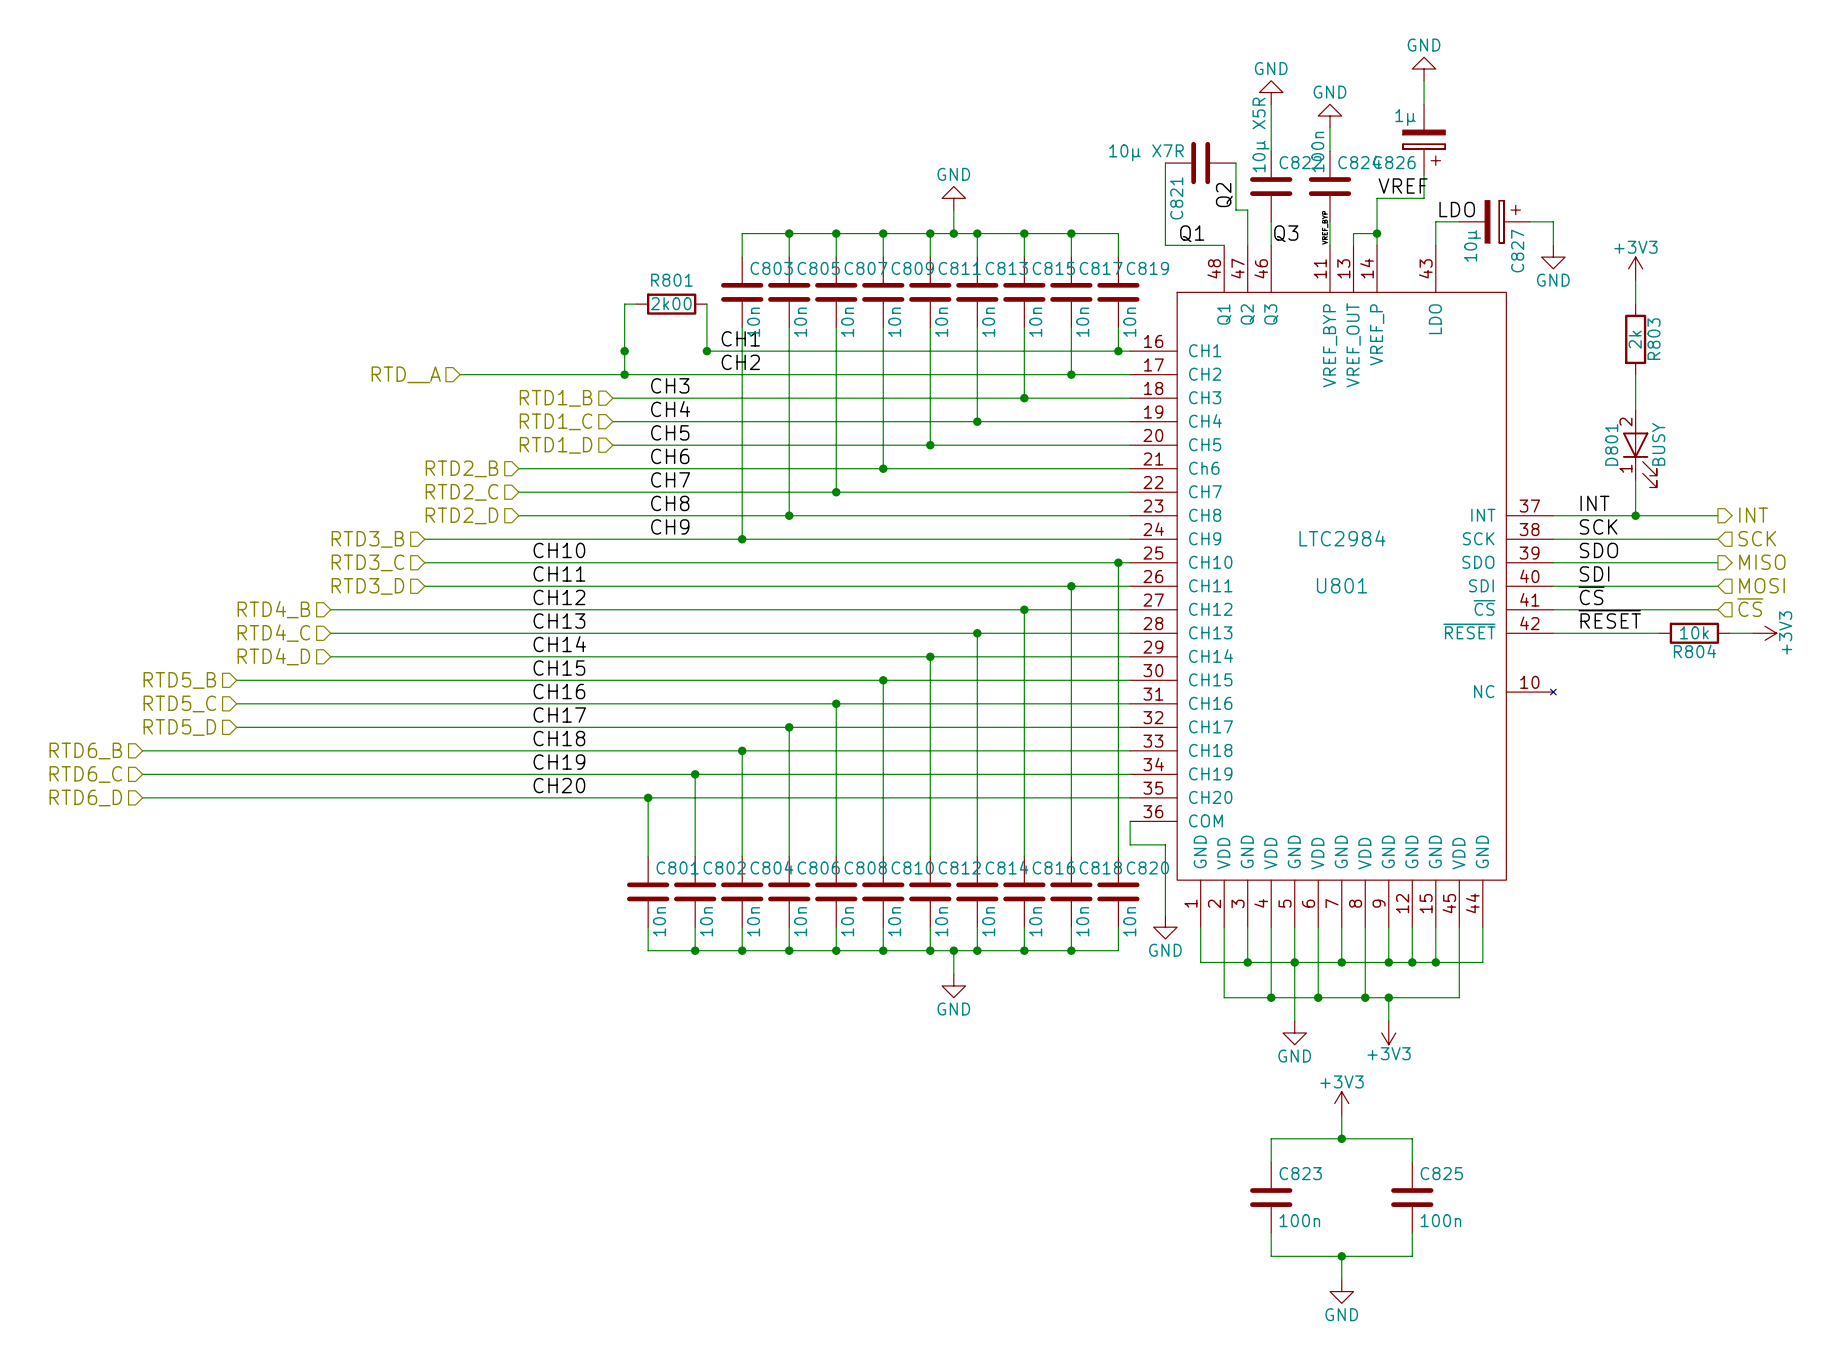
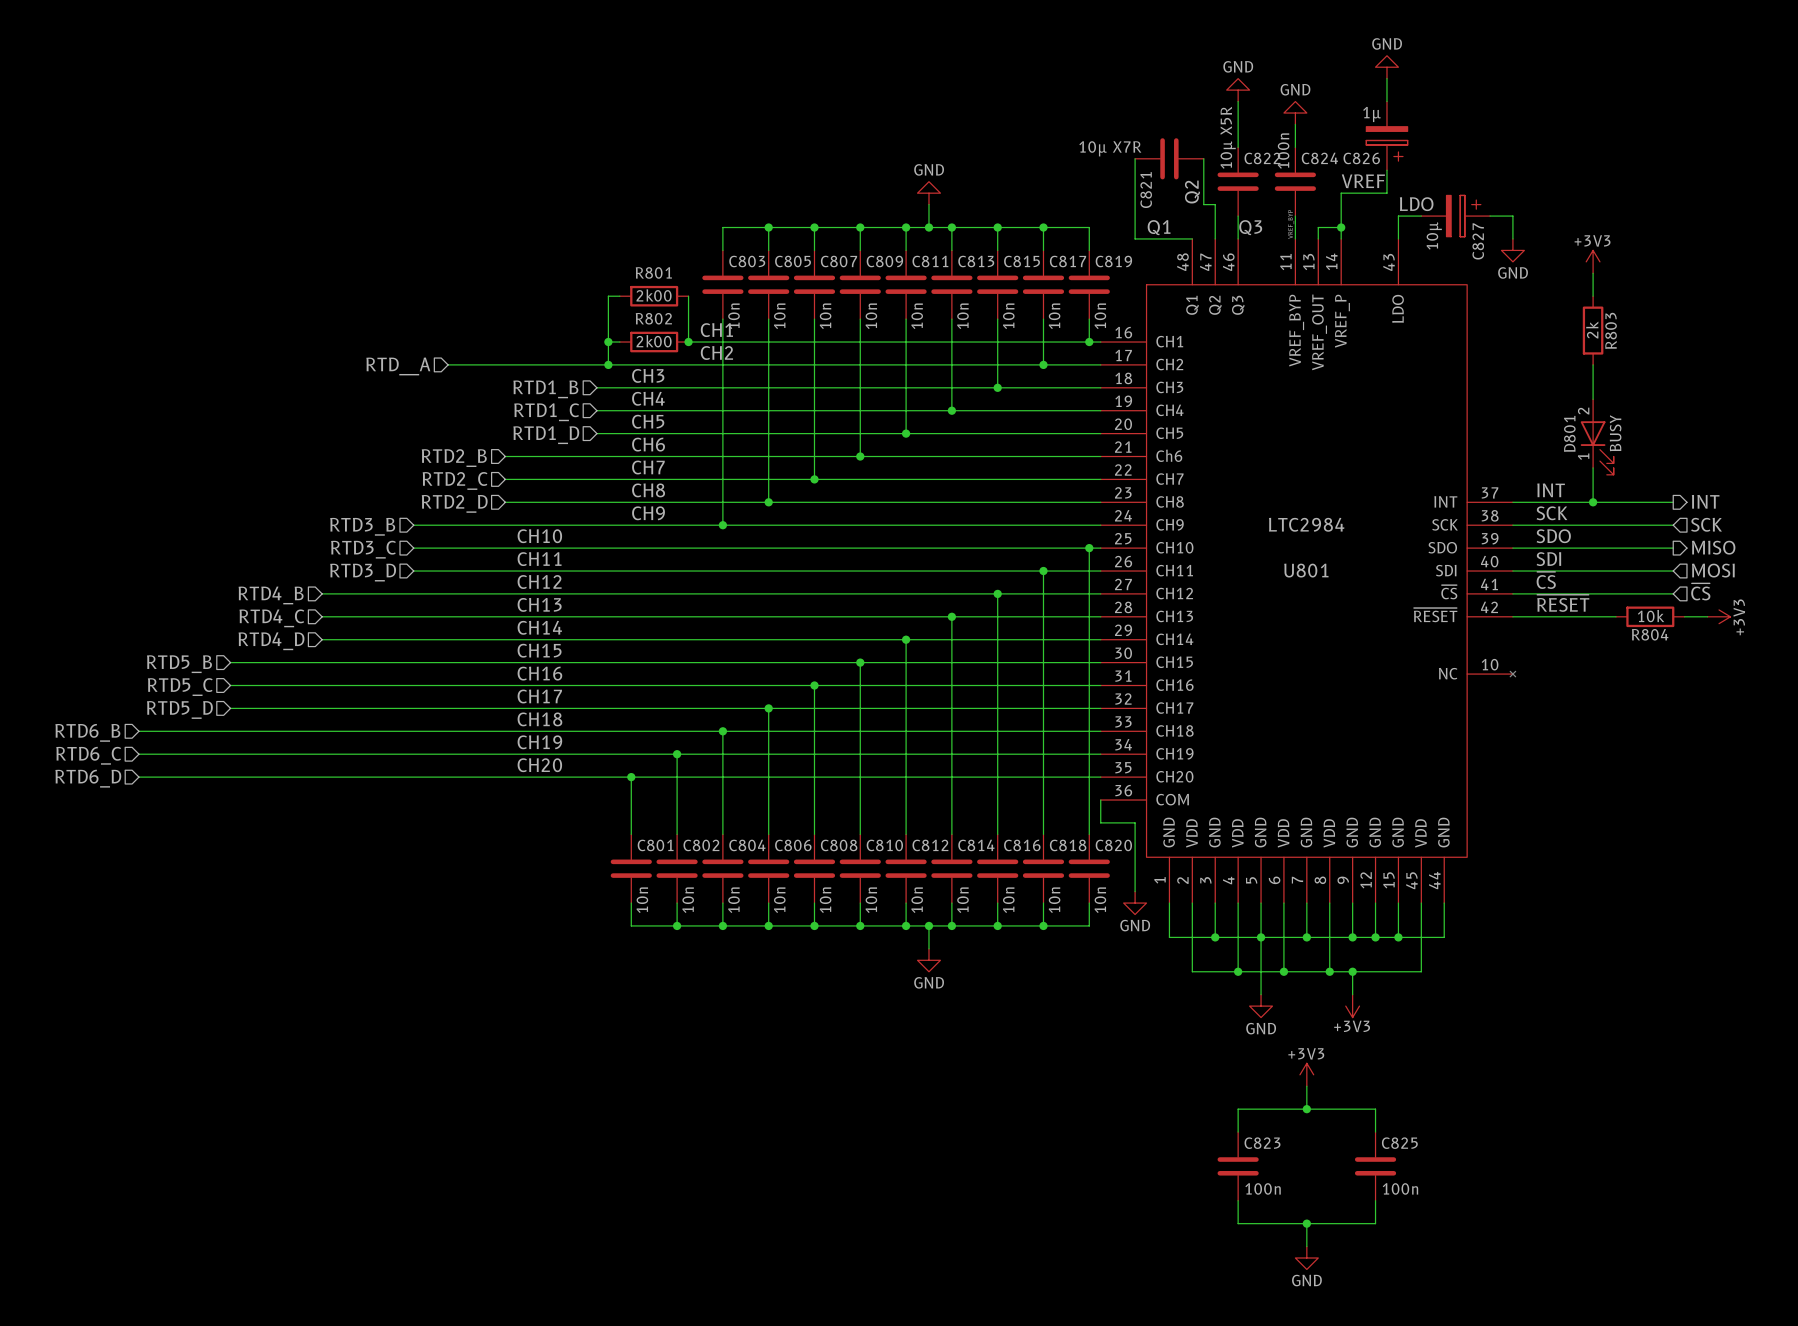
wire: none -> (608, 342) (619, 342)
R802: none -> 2k00 (654, 342)

